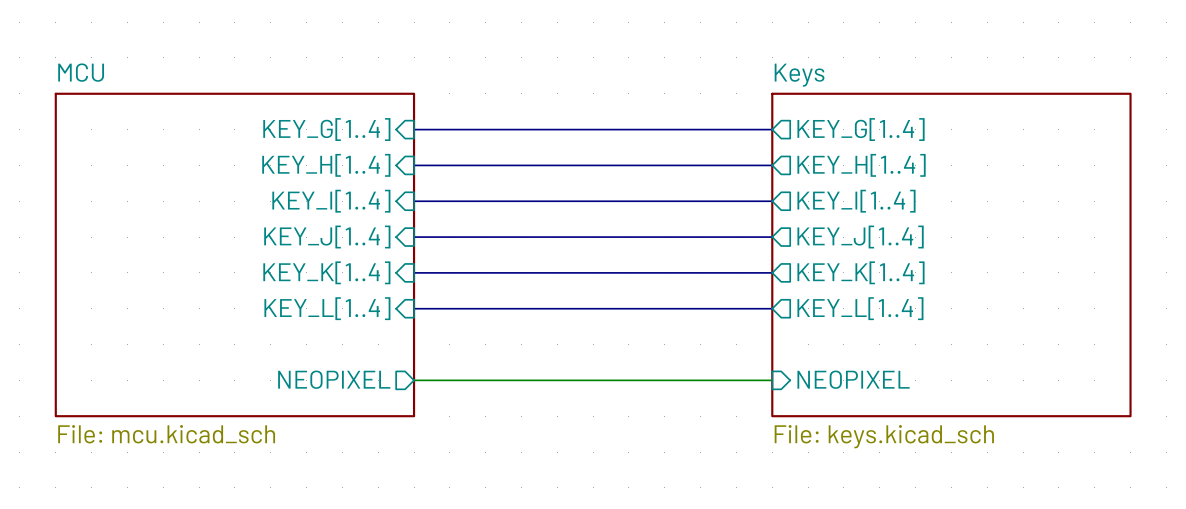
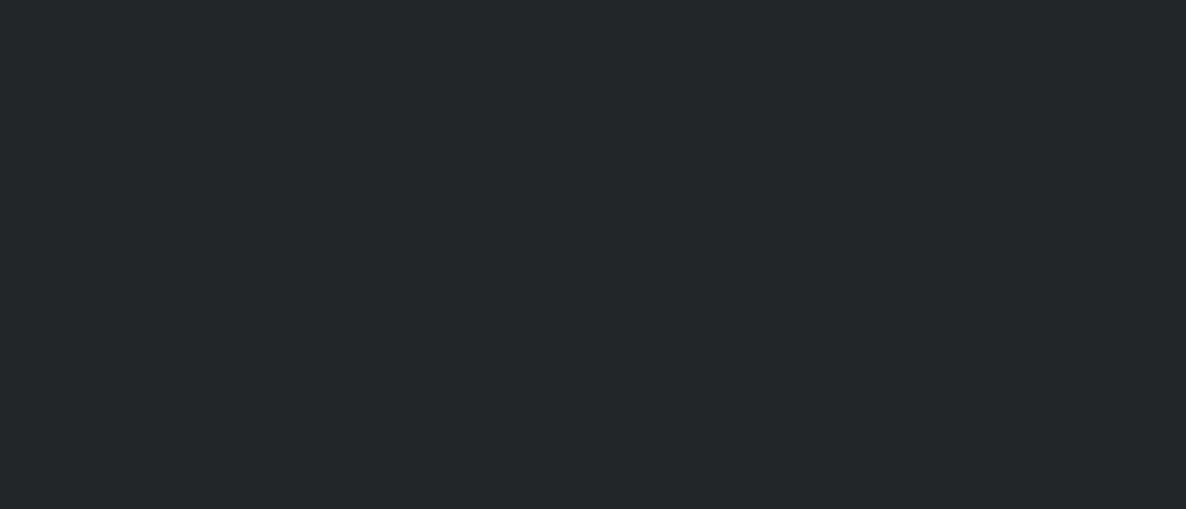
sheet pin: KEY_G[1..4] (326, 129) -> none
bus: (414, 129) (772, 129) -> none
sheet pin: KEY_G[1..4] (861, 129) -> none
sheet pin: KEY_H[1..4] (326, 165) -> none
bus: (414, 165) (772, 165) -> none
sheet pin: KEY_H[1..4] (861, 165) -> none
sheet pin: KEY_I[1..4] (331, 201) -> none
bus: (414, 201) (772, 201) -> none
sheet pin: KEY_I[1..4] (856, 201) -> none
sheet pin: KEY_J[1..4] (327, 237) -> none
bus: (414, 237) (772, 237) -> none
sheet pin: KEY_J[1..4] (860, 237) -> none
sheet MCU: File: mcu.kicad_sch (234, 254) -> none
sheet Keys: File: keys.kicad_sch (951, 254) -> none
sheet pin: KEY_K[1..4] (326, 272) -> none
bus: (414, 272) (772, 272) -> none
sheet pin: KEY_K[1..4] (861, 272) -> none
sheet pin: KEY_L[1..4] (327, 308) -> none
bus: (414, 308) (772, 308) -> none
sheet pin: KEY_L[1..4] (860, 308) -> none
sheet pin: NEOPIXEL (334, 379) -> none
sheet pin: NEOPIXEL (853, 379) -> none
wire: (414, 380) (772, 380) -> none

